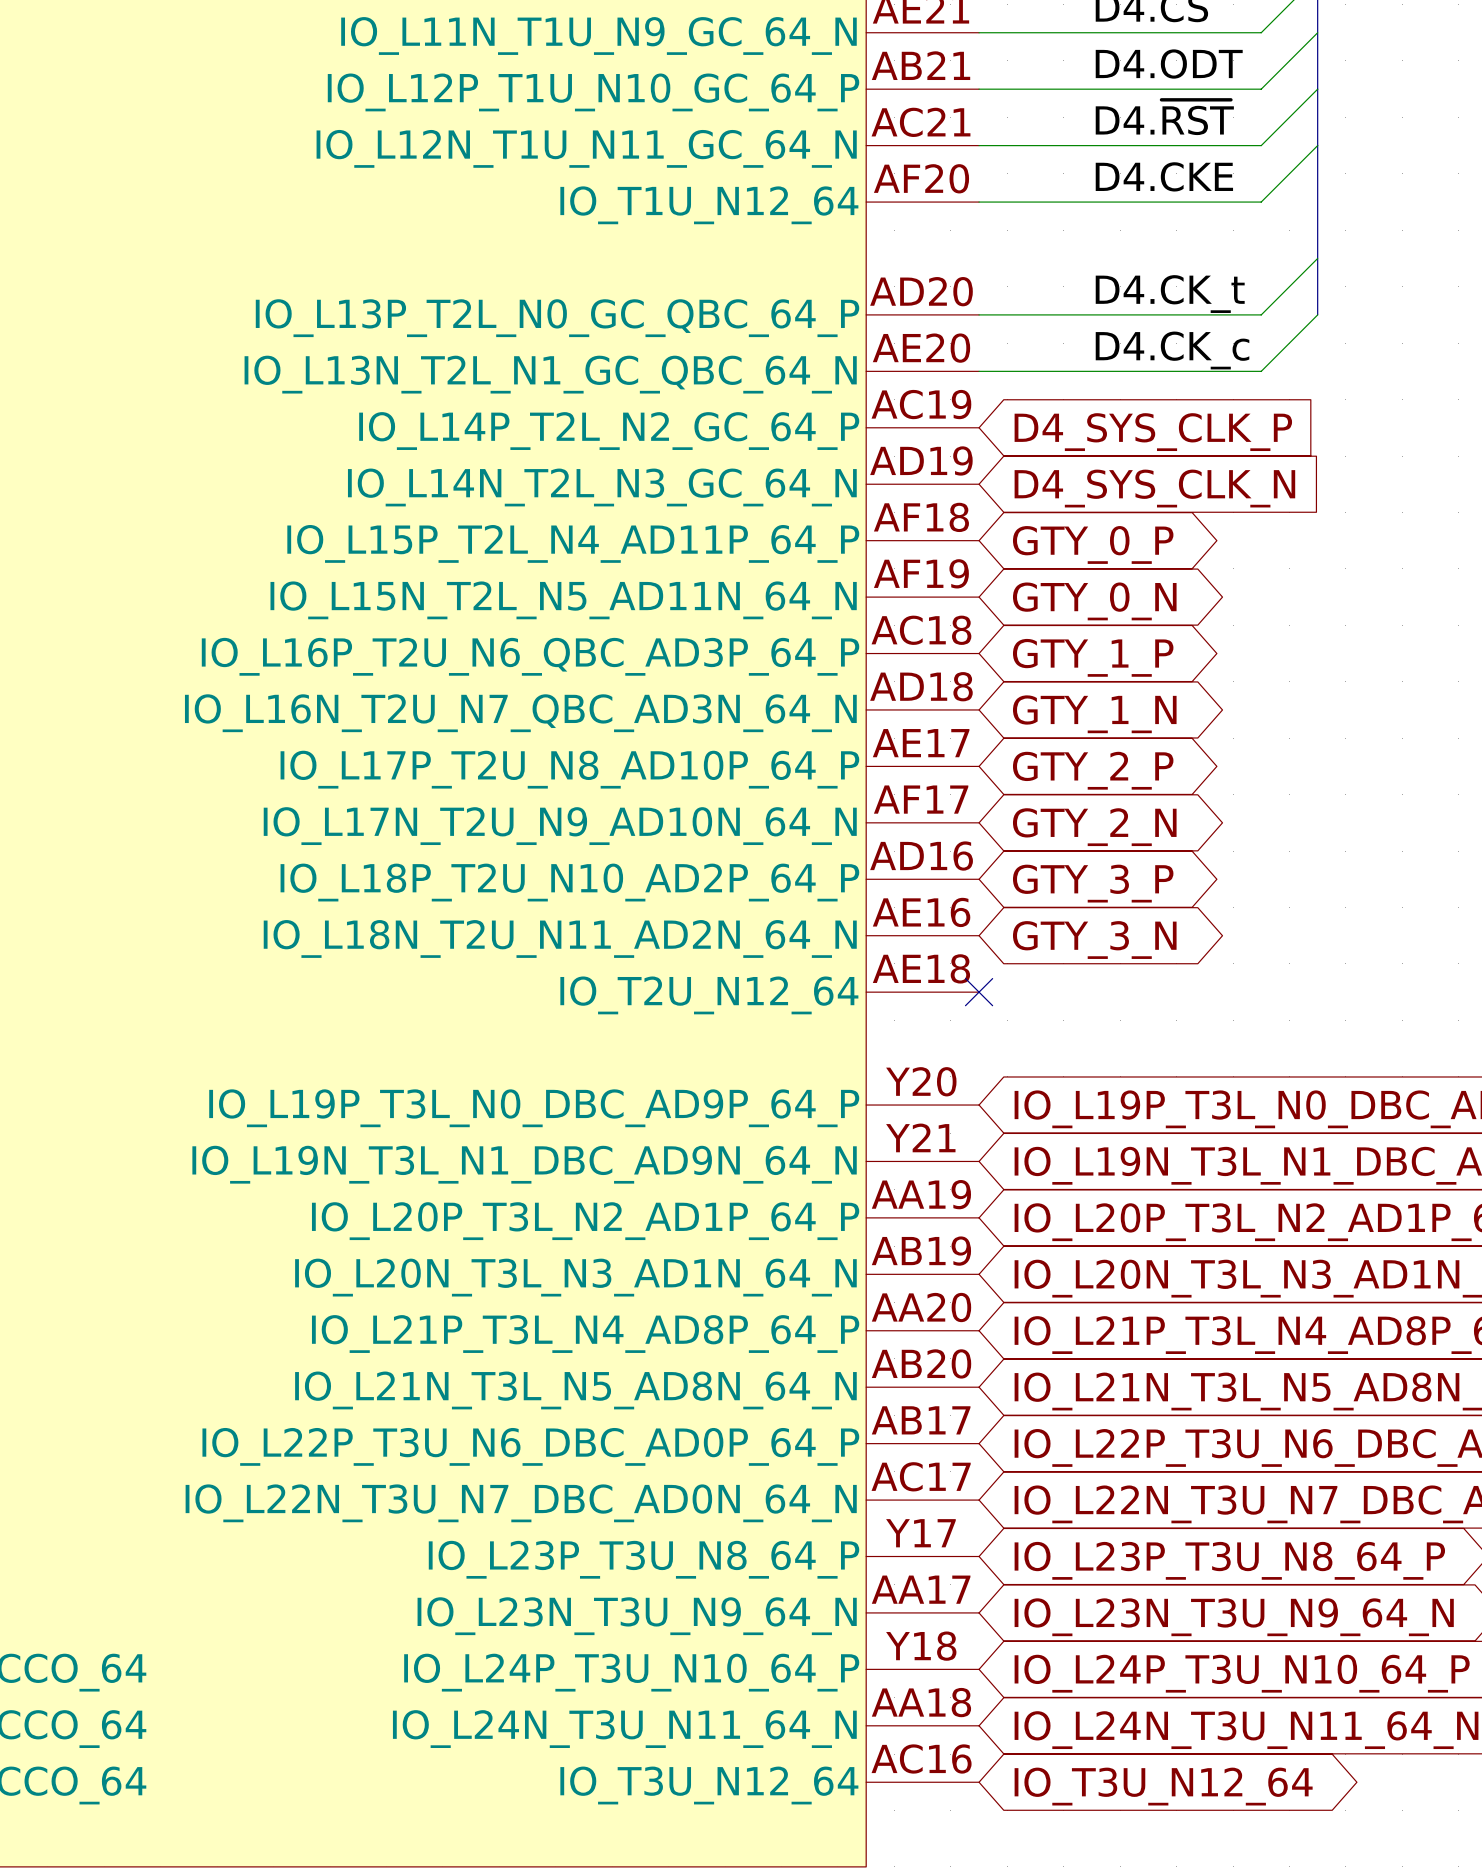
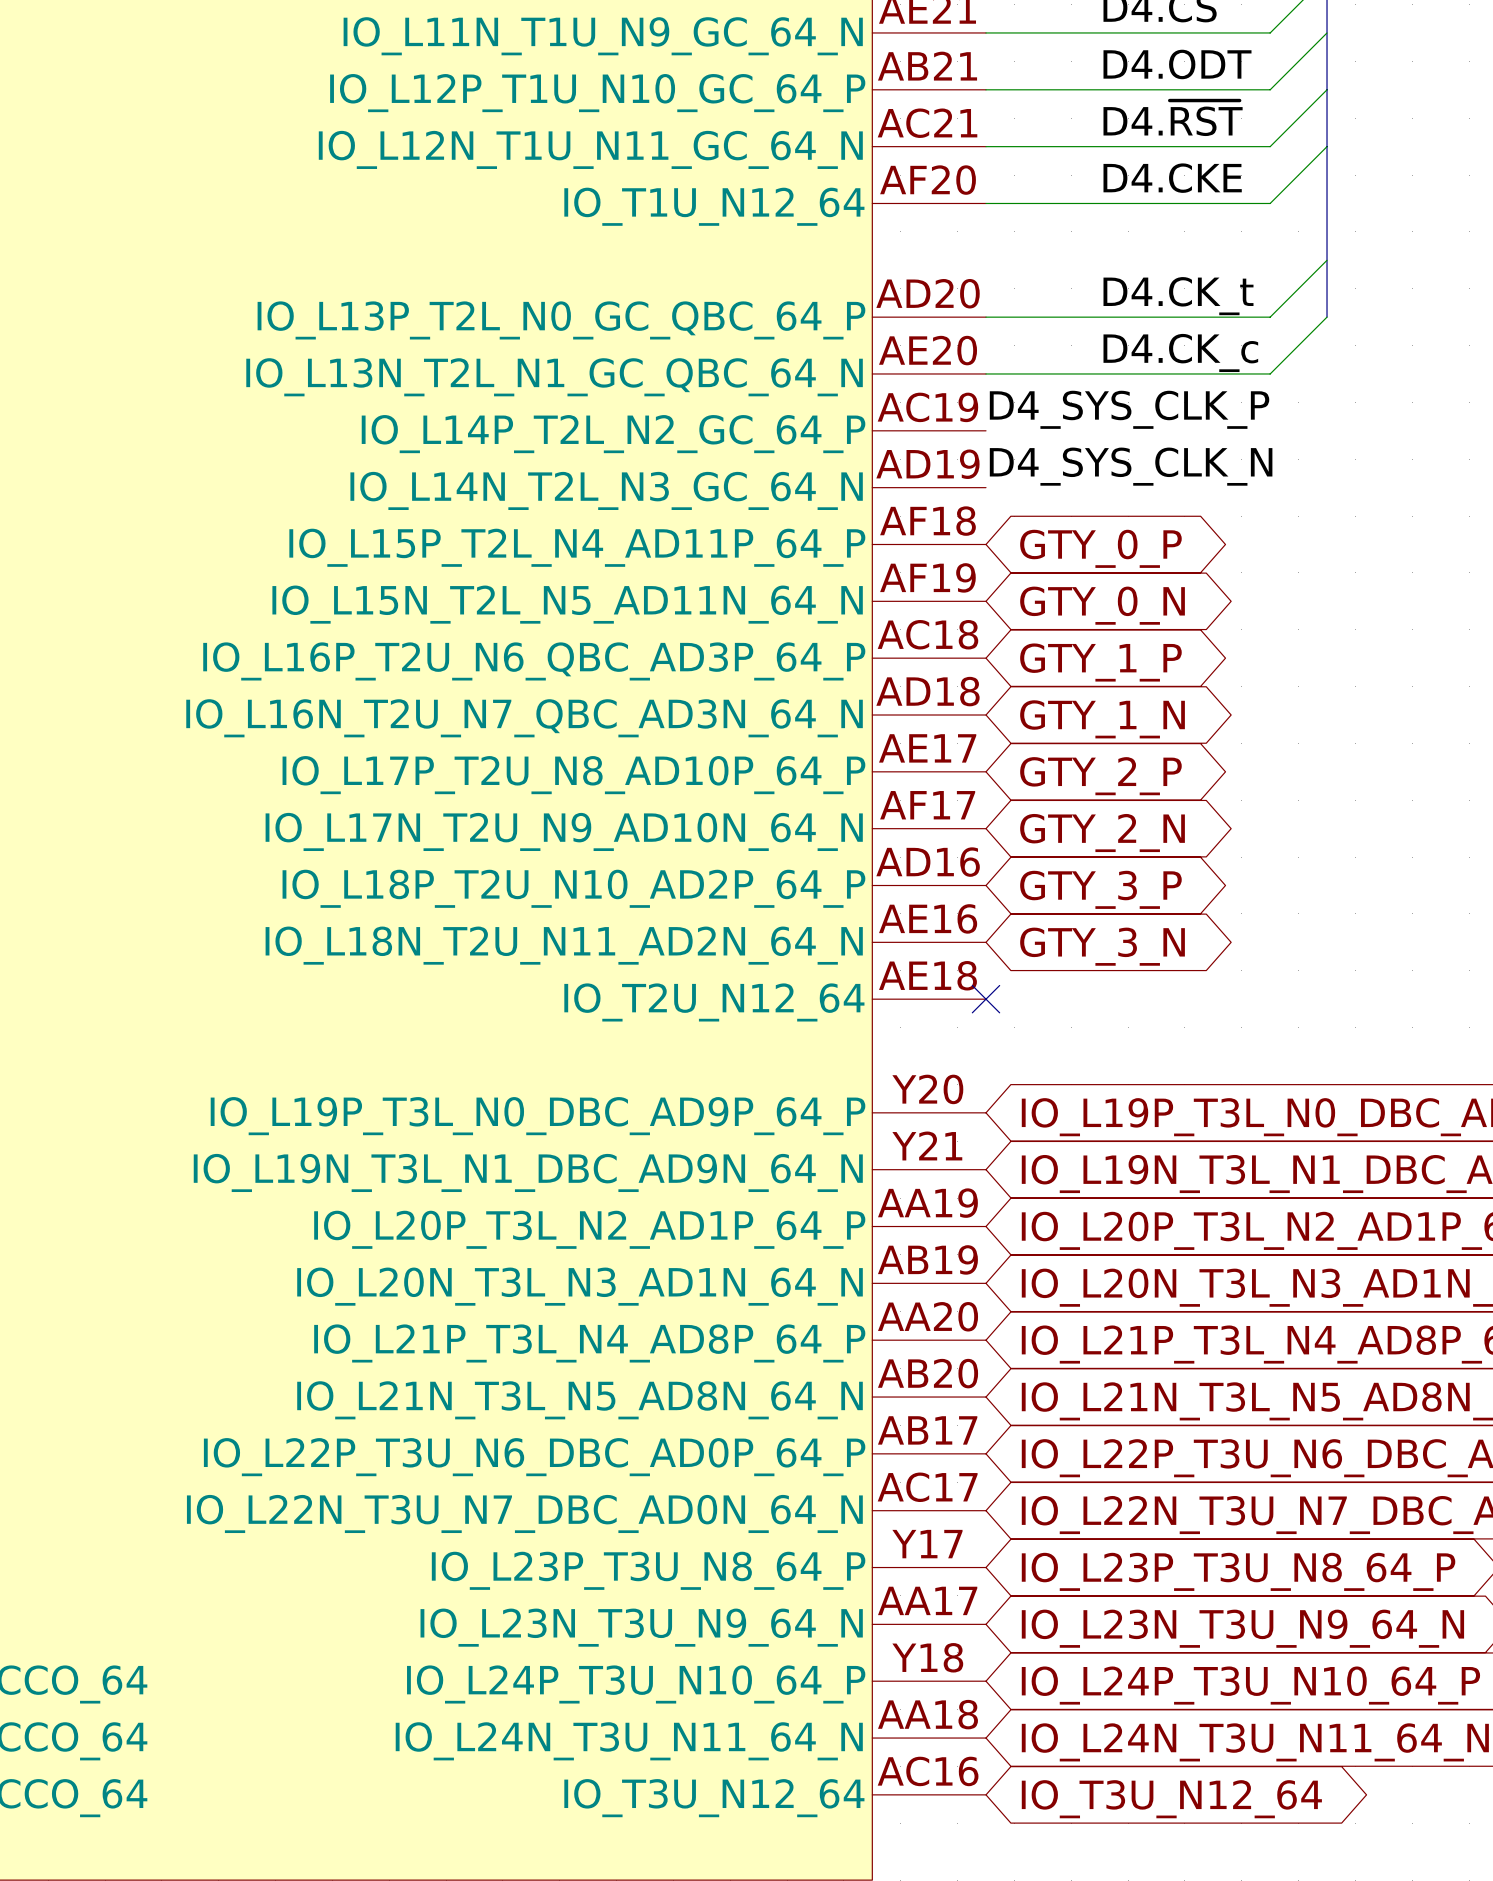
label: none -> D4_SYS_CLK_P (1129, 409)
global label: D4_SYS_CLK_P (1153, 432) -> none
label: none -> D4_SYS_CLK_N (1131, 466)
global label: D4_SYS_CLK_N (1154, 488) -> none

